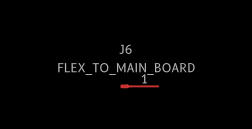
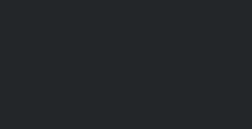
J6: FLEX_TO_MAIN_BOARD (139, 86) -> none

